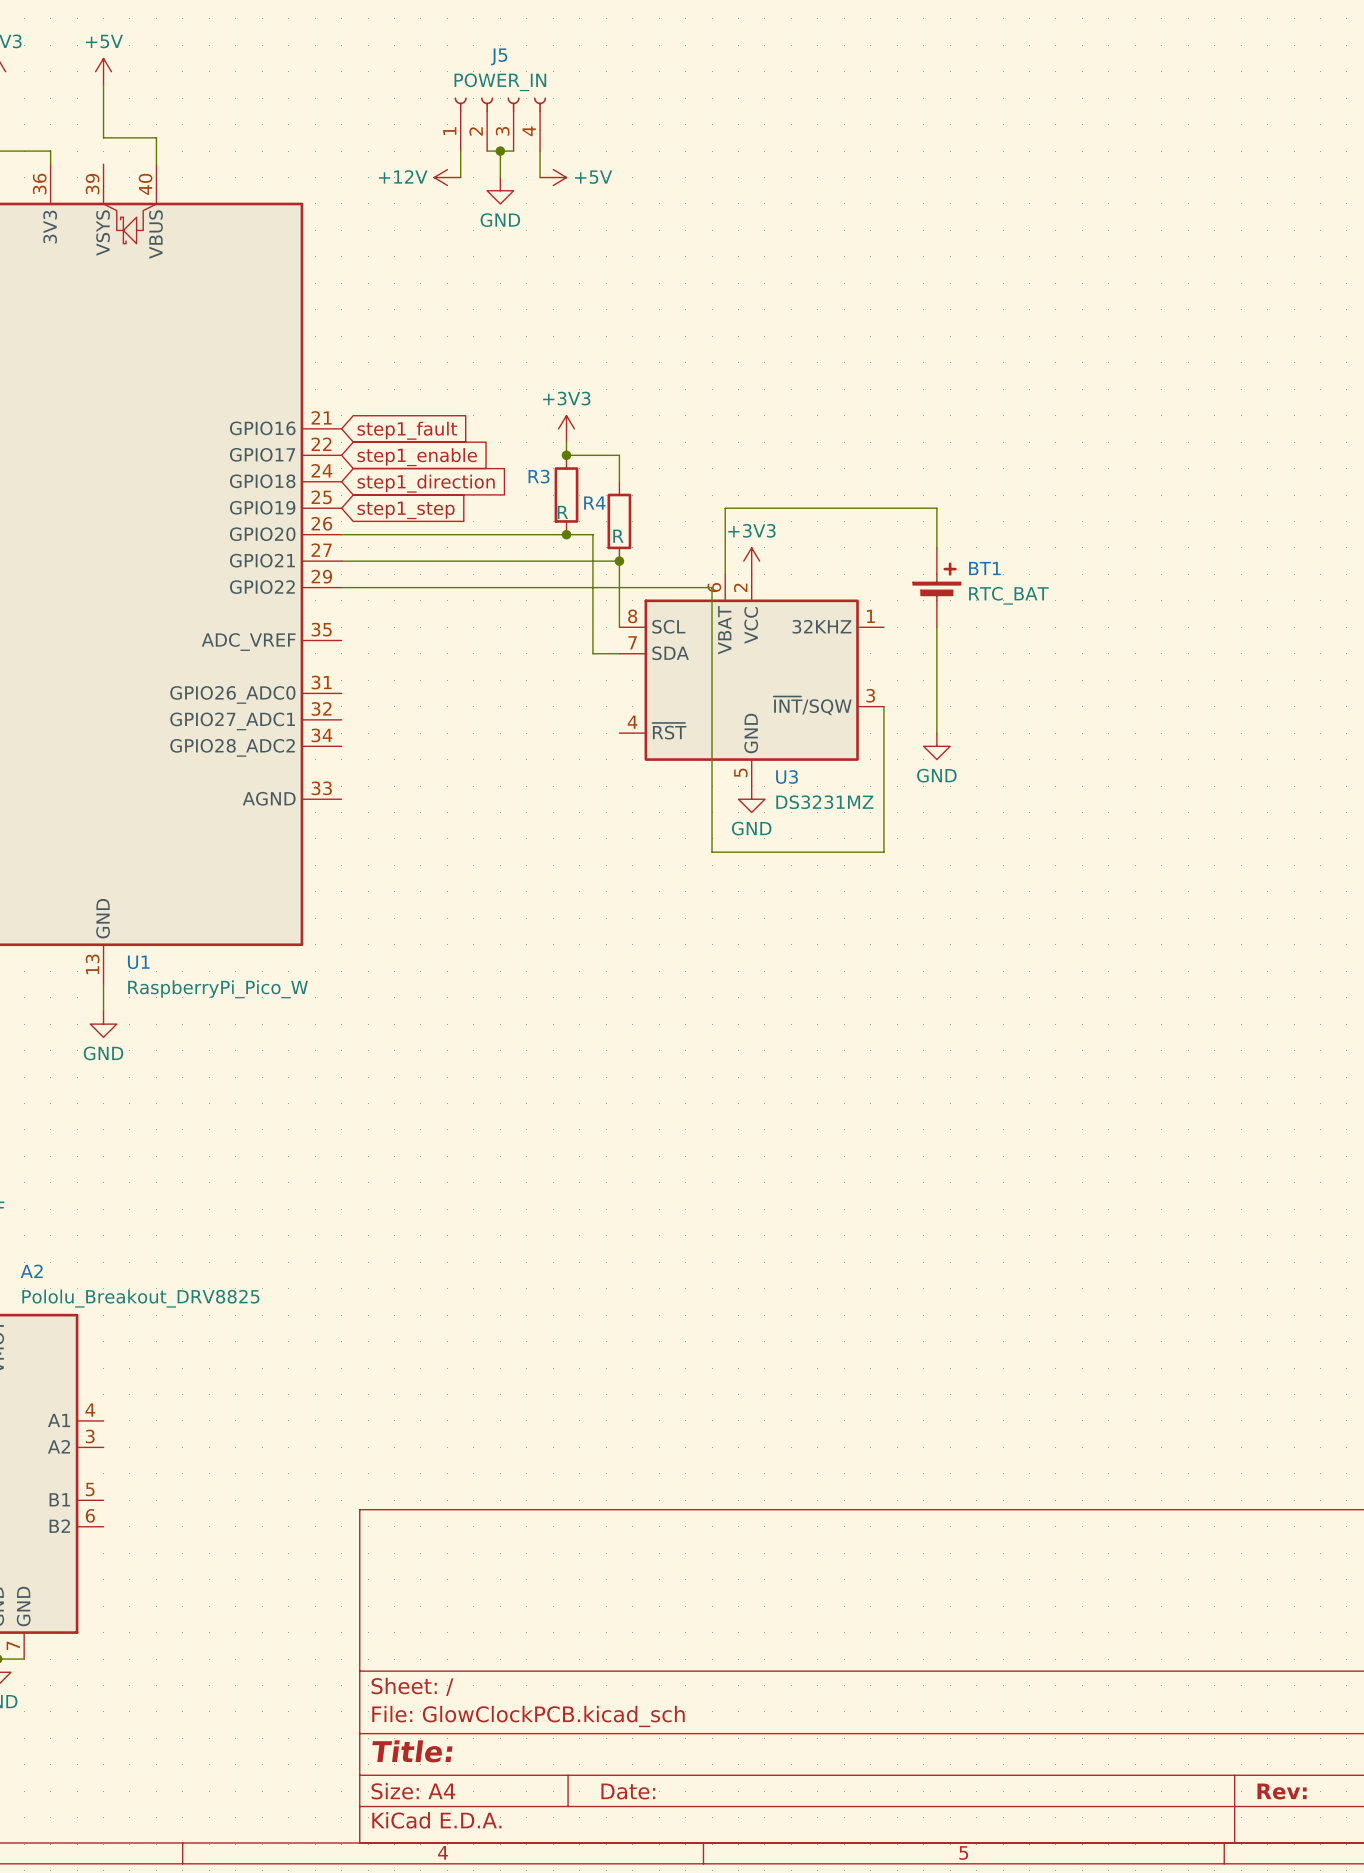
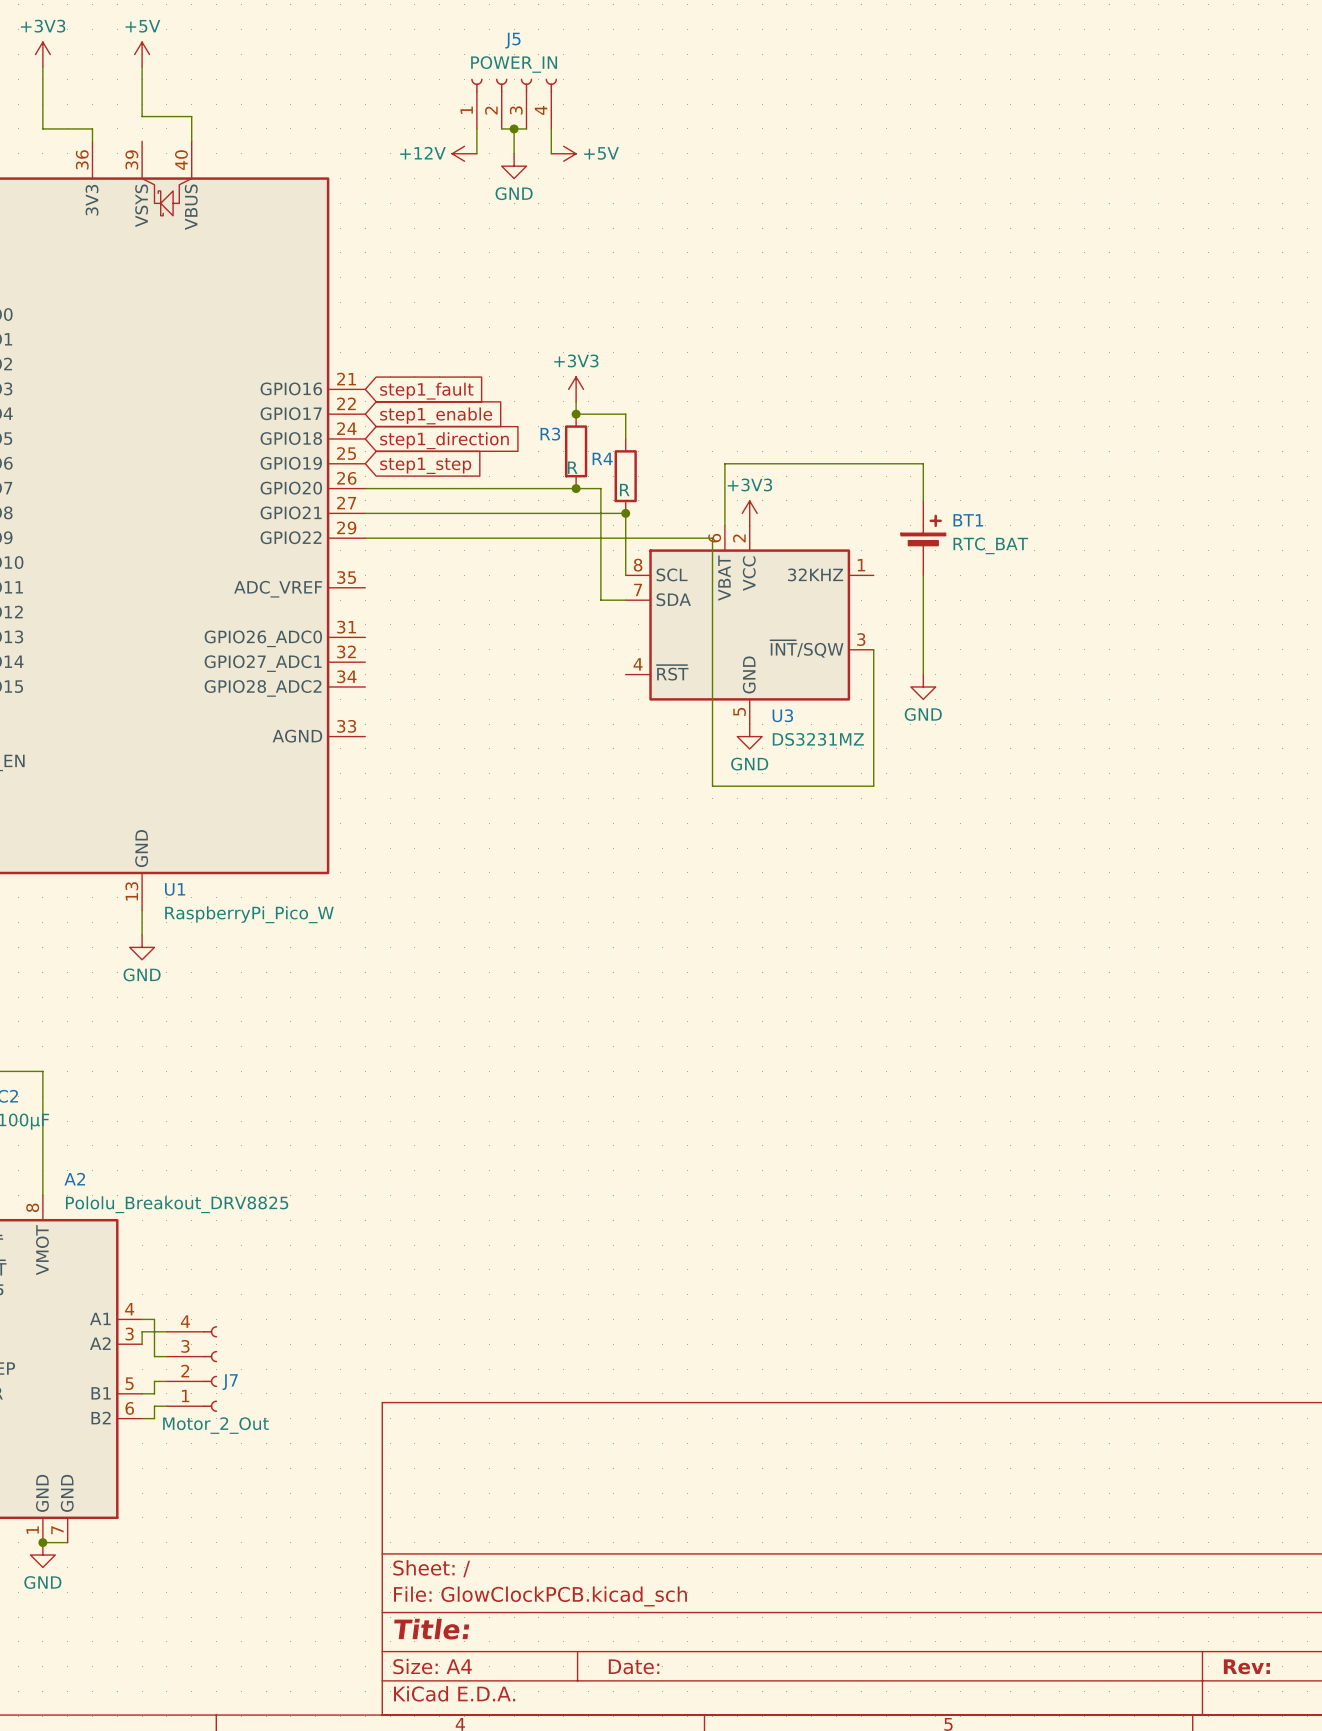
wire: none -> (142, 1319) (154, 1319) (154, 1356) (166, 1356)
wire: none -> (166, 1331) (142, 1331) (142, 1344)
J7: none -> Motor_2_Out (192, 1369)
wire: none -> (166, 1381) (154, 1381) (154, 1393) (142, 1393)
wire: none -> (166, 1406) (154, 1406) (154, 1418) (142, 1418)

